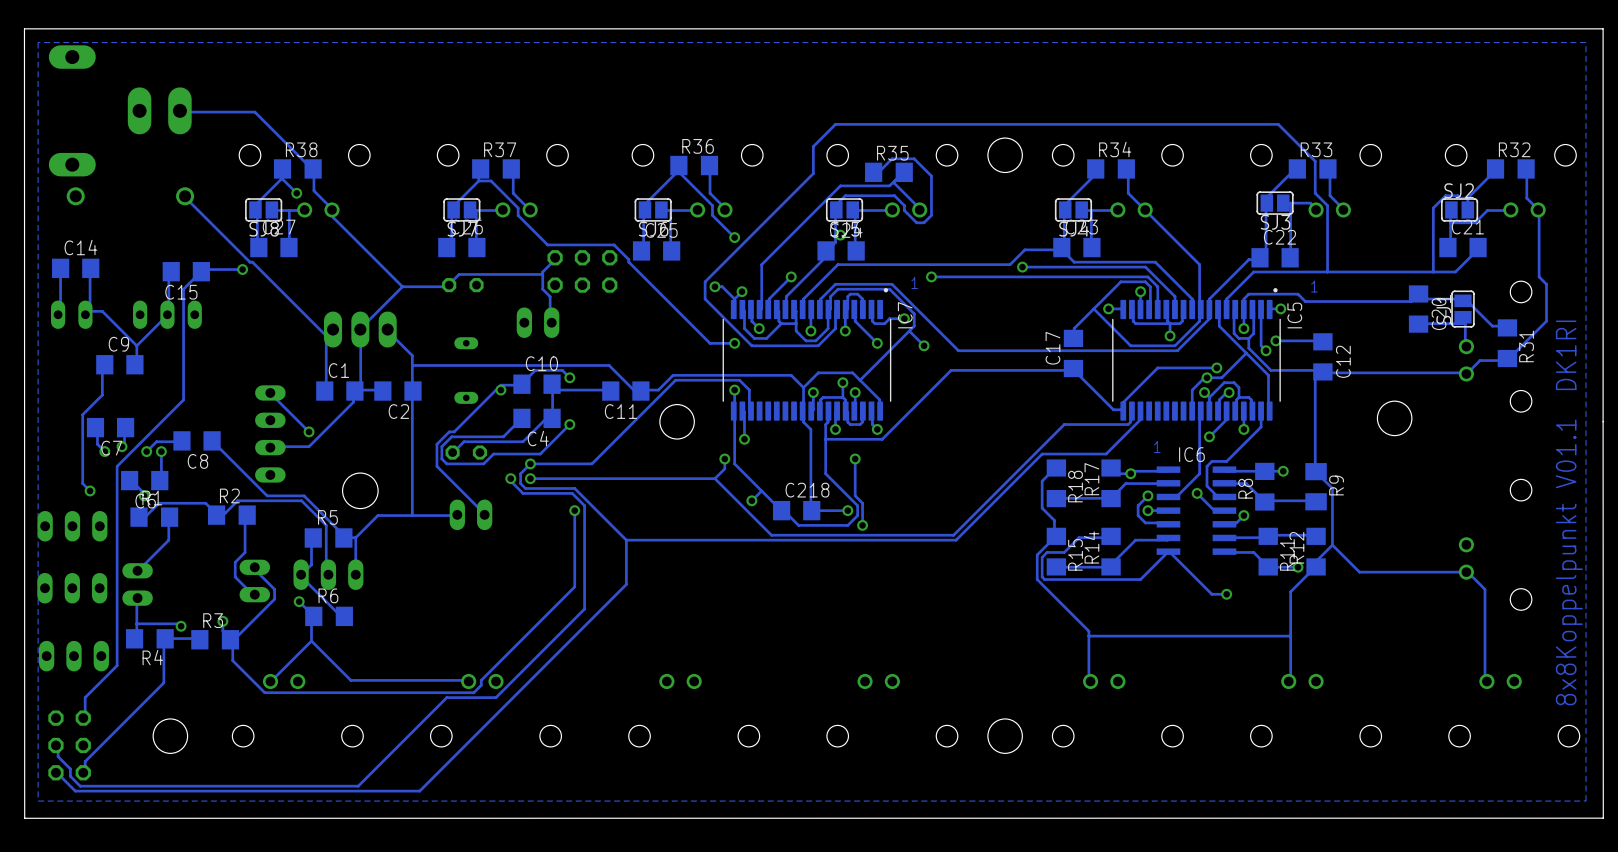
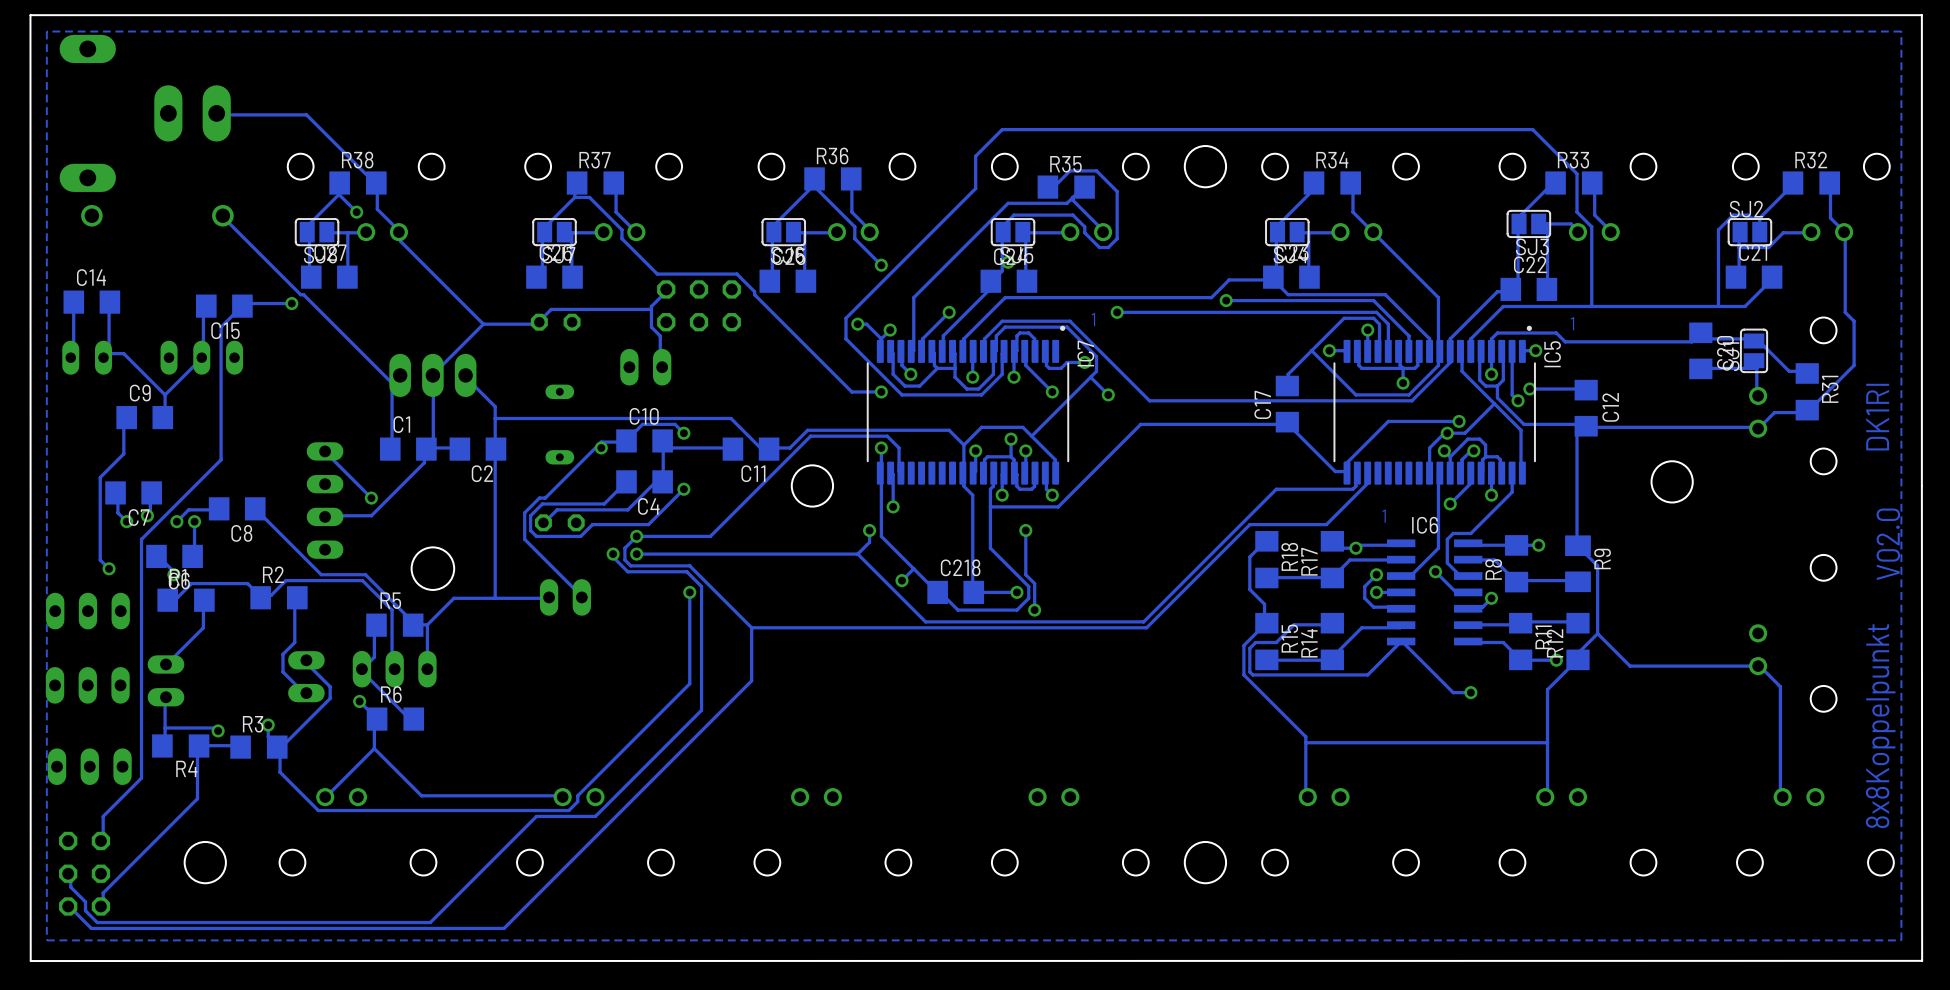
text: V01.1 (1566, 453) -> none
text: none -> V02.0 (1888, 544)

